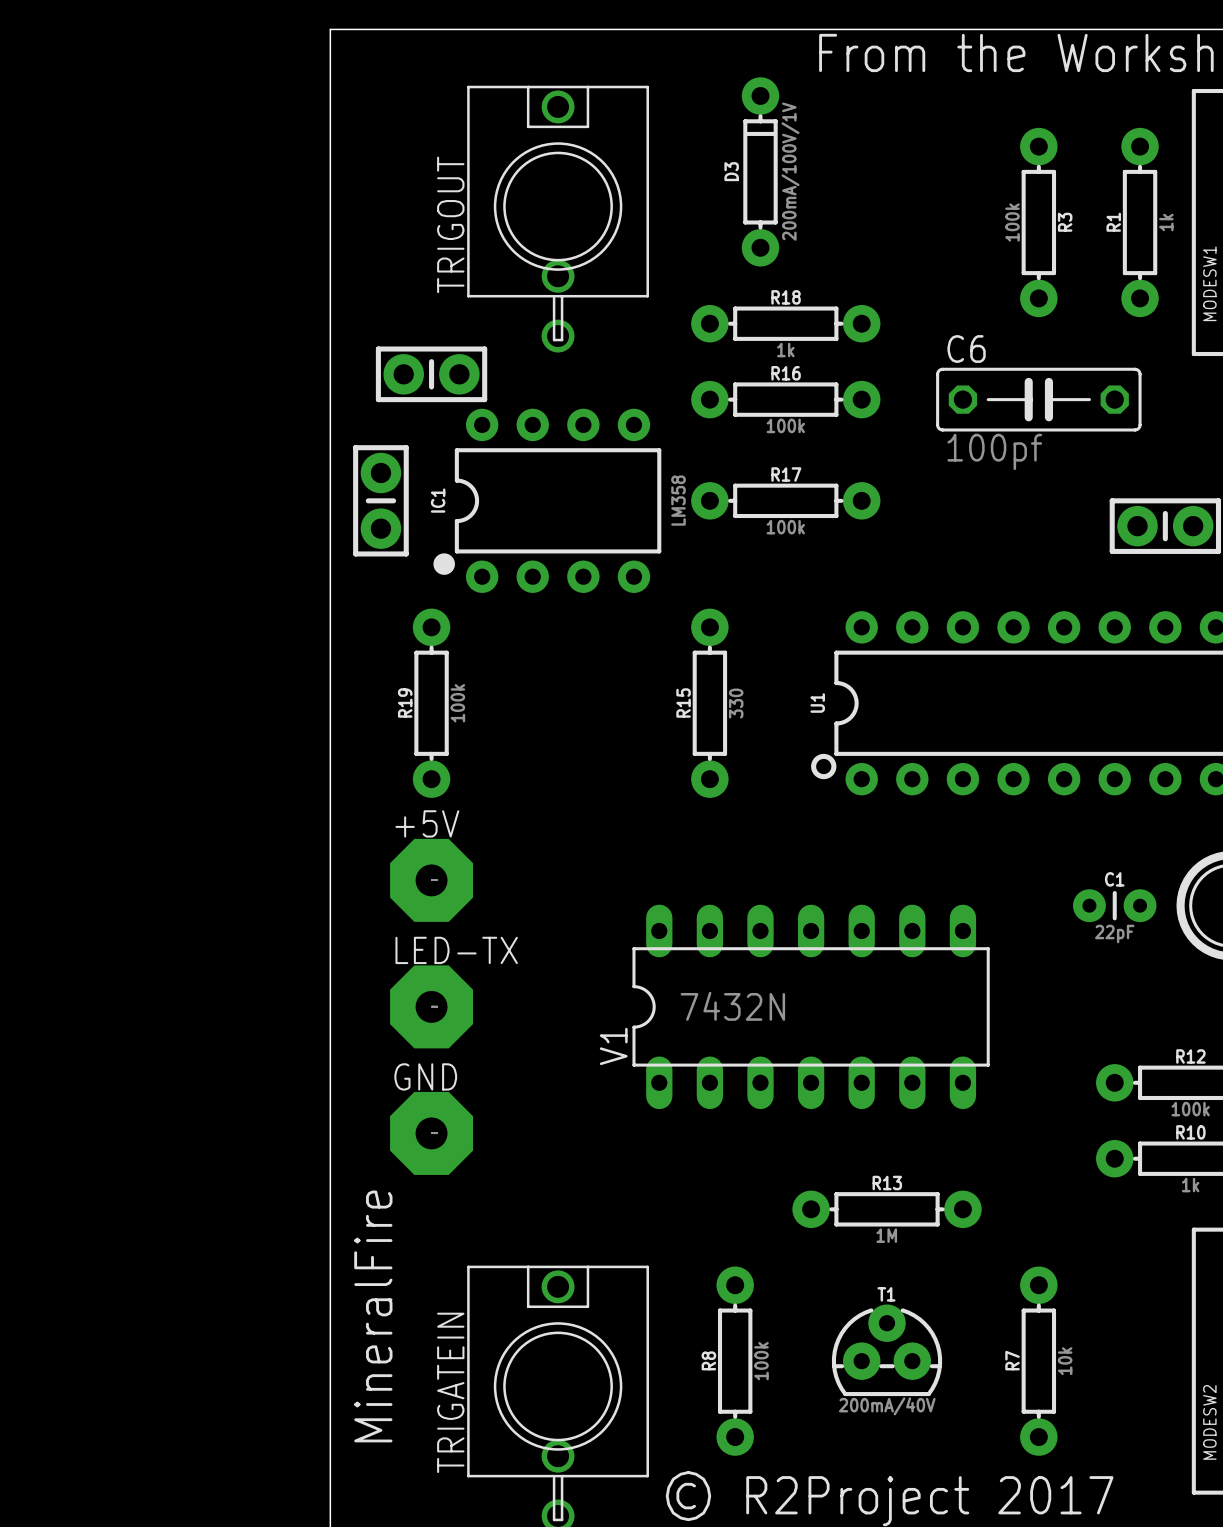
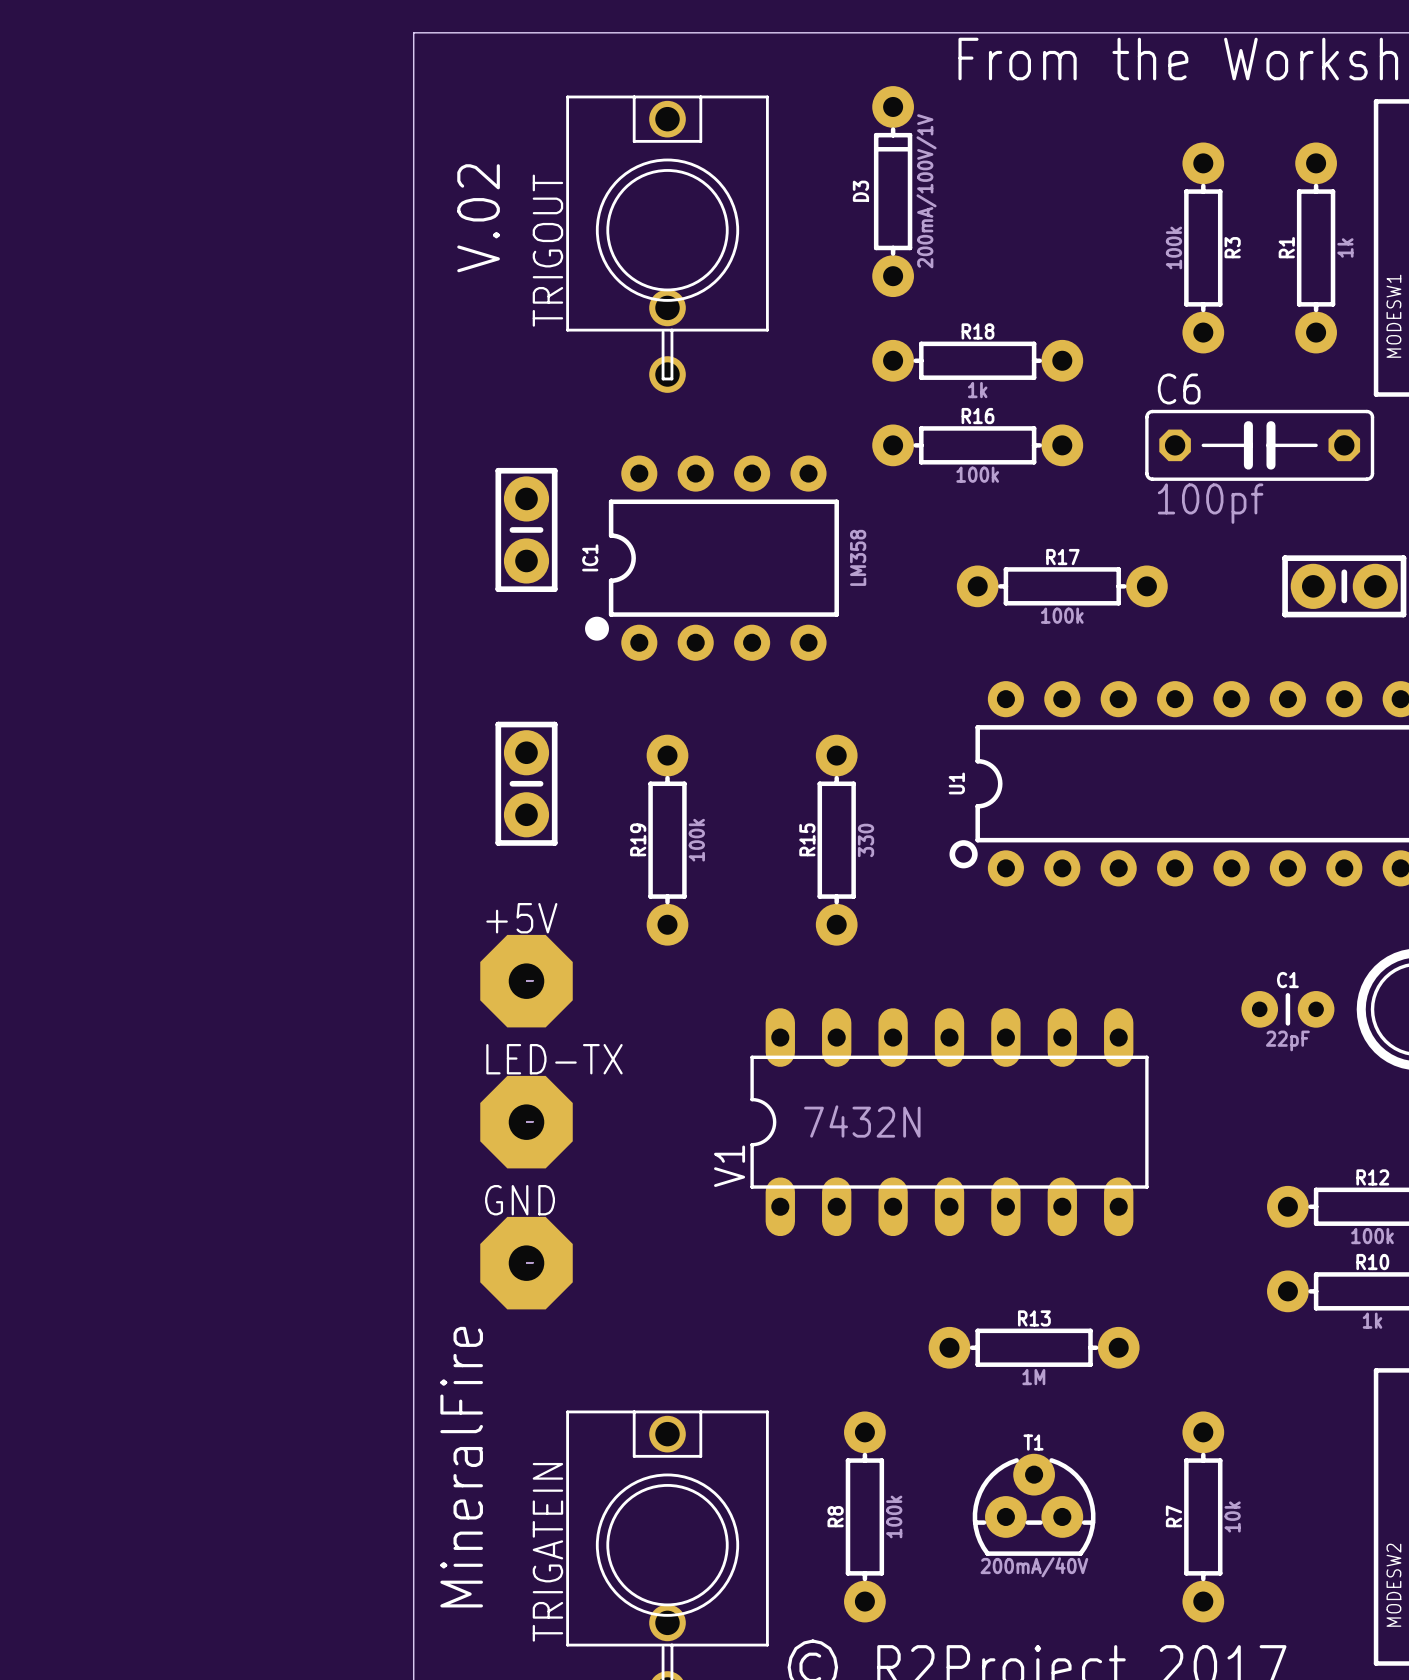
text: none -> V.02 (478, 218)
R18 position: (785, 323) -> (977, 360)
part: (431, 374) -> none
R16 position: (785, 399) -> (977, 445)
C6 position: (1038, 399) -> (1259, 445)
part: none -> (526, 529)
part: (380, 500) -> none
IC1 position: (547, 500) -> (711, 558)
R17 position: (785, 500) -> (1062, 586)
R19 position: (431, 703) -> (667, 840)
part: none -> (526, 783)
R15 position: (709, 703) -> (836, 840)

